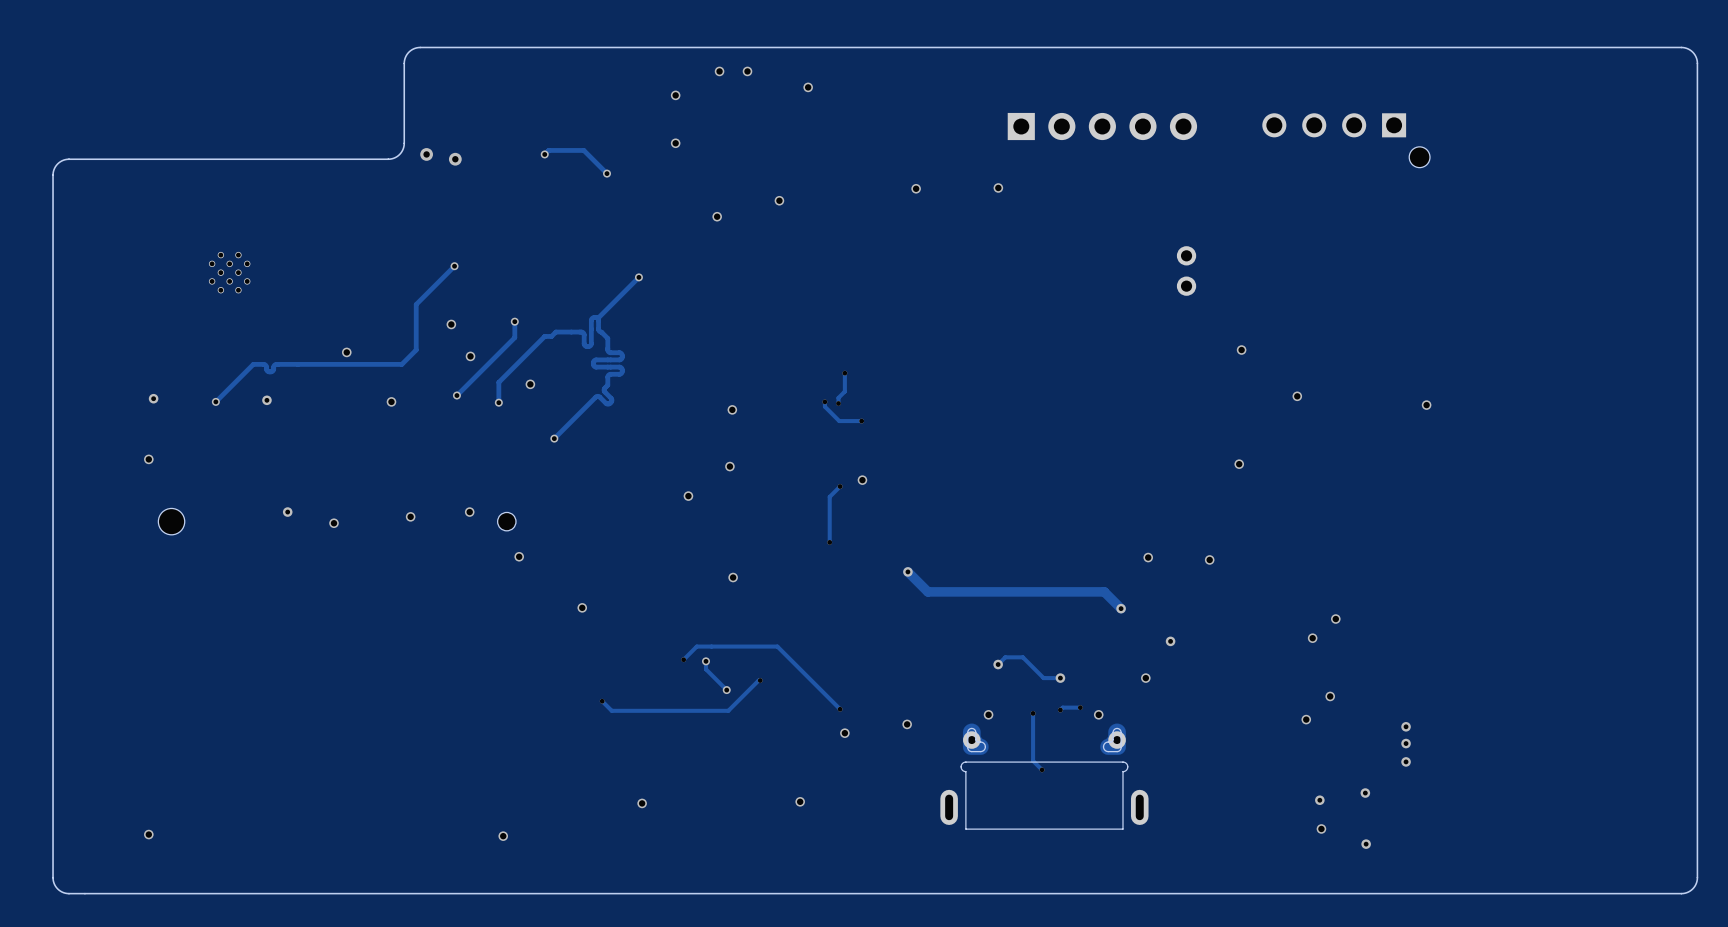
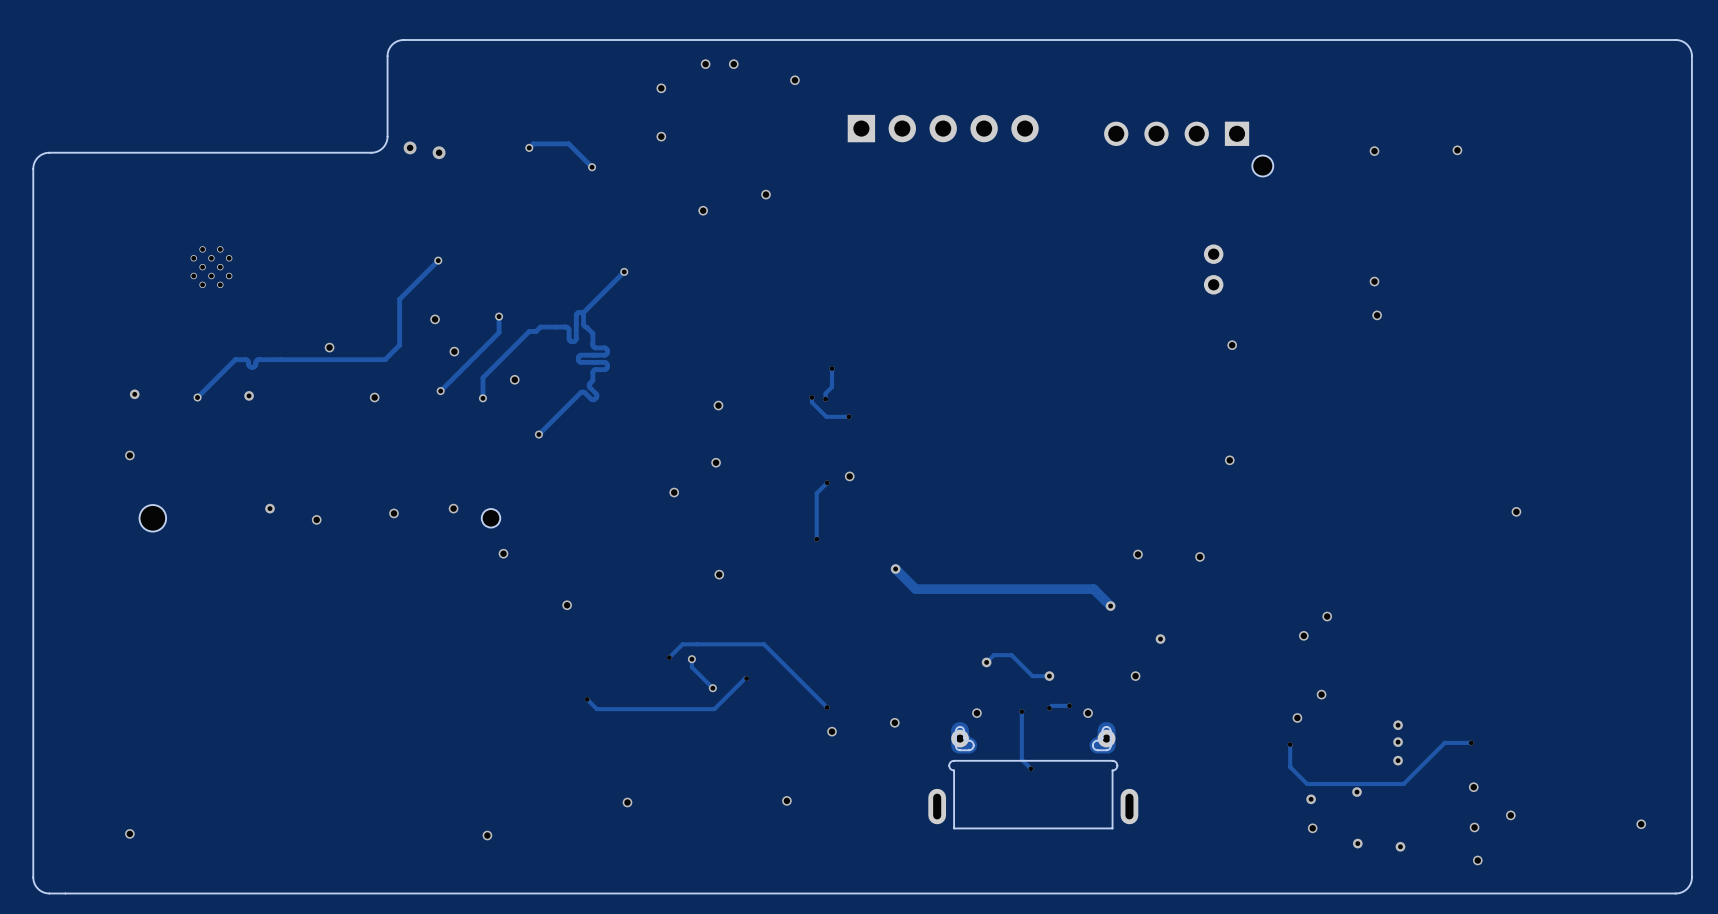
part position: (1102, 126) -> (943, 128)
part position: (1346, 140) -> (1188, 149)
via: none -> (1457, 150)
via: none -> (1374, 151)
via: (998, 187) -> none
via: (916, 188) -> none
part position: (1186, 270) -> (1213, 269)
via: none -> (1374, 281)
via: none -> (1377, 315)
via: (1297, 396) -> none
via: (1426, 405) -> none
via: none -> (1516, 511)
track: none -> (1471, 742) (1444, 742) (1403, 783) (1307, 783) (1290, 767) (1290, 744)
via: none -> (1471, 742)
via: none -> (1290, 744)
via: none -> (1473, 787)
via: none -> (1510, 815)
via: none -> (1641, 824)
via: none -> (1474, 827)
via: none -> (1400, 846)
via: none -> (1477, 860)

